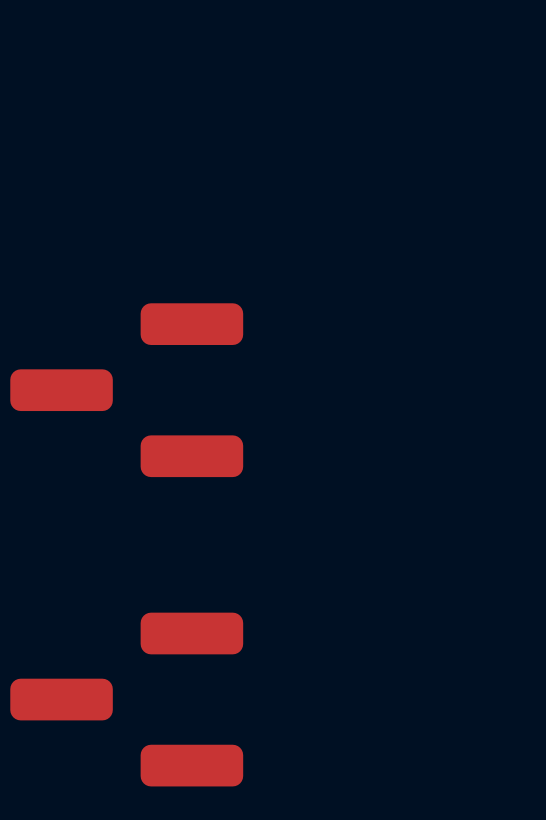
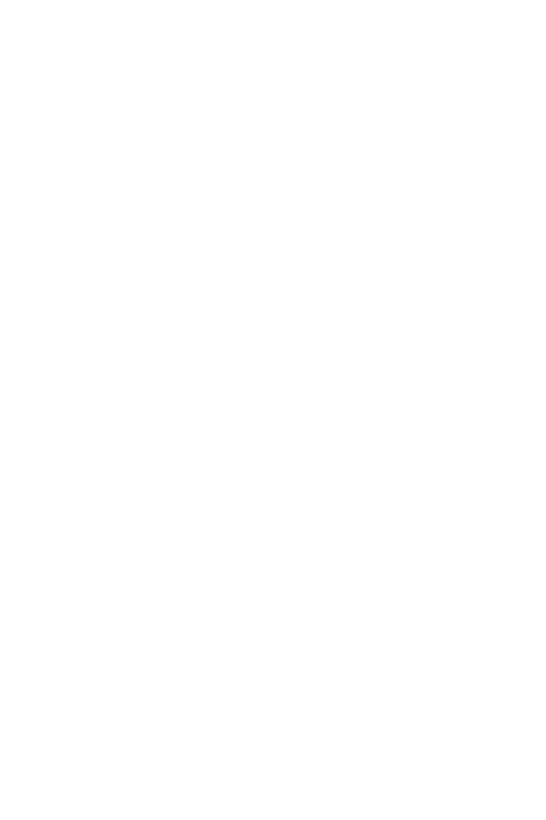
part: (126, 390) -> none
part: (126, 699) -> none

